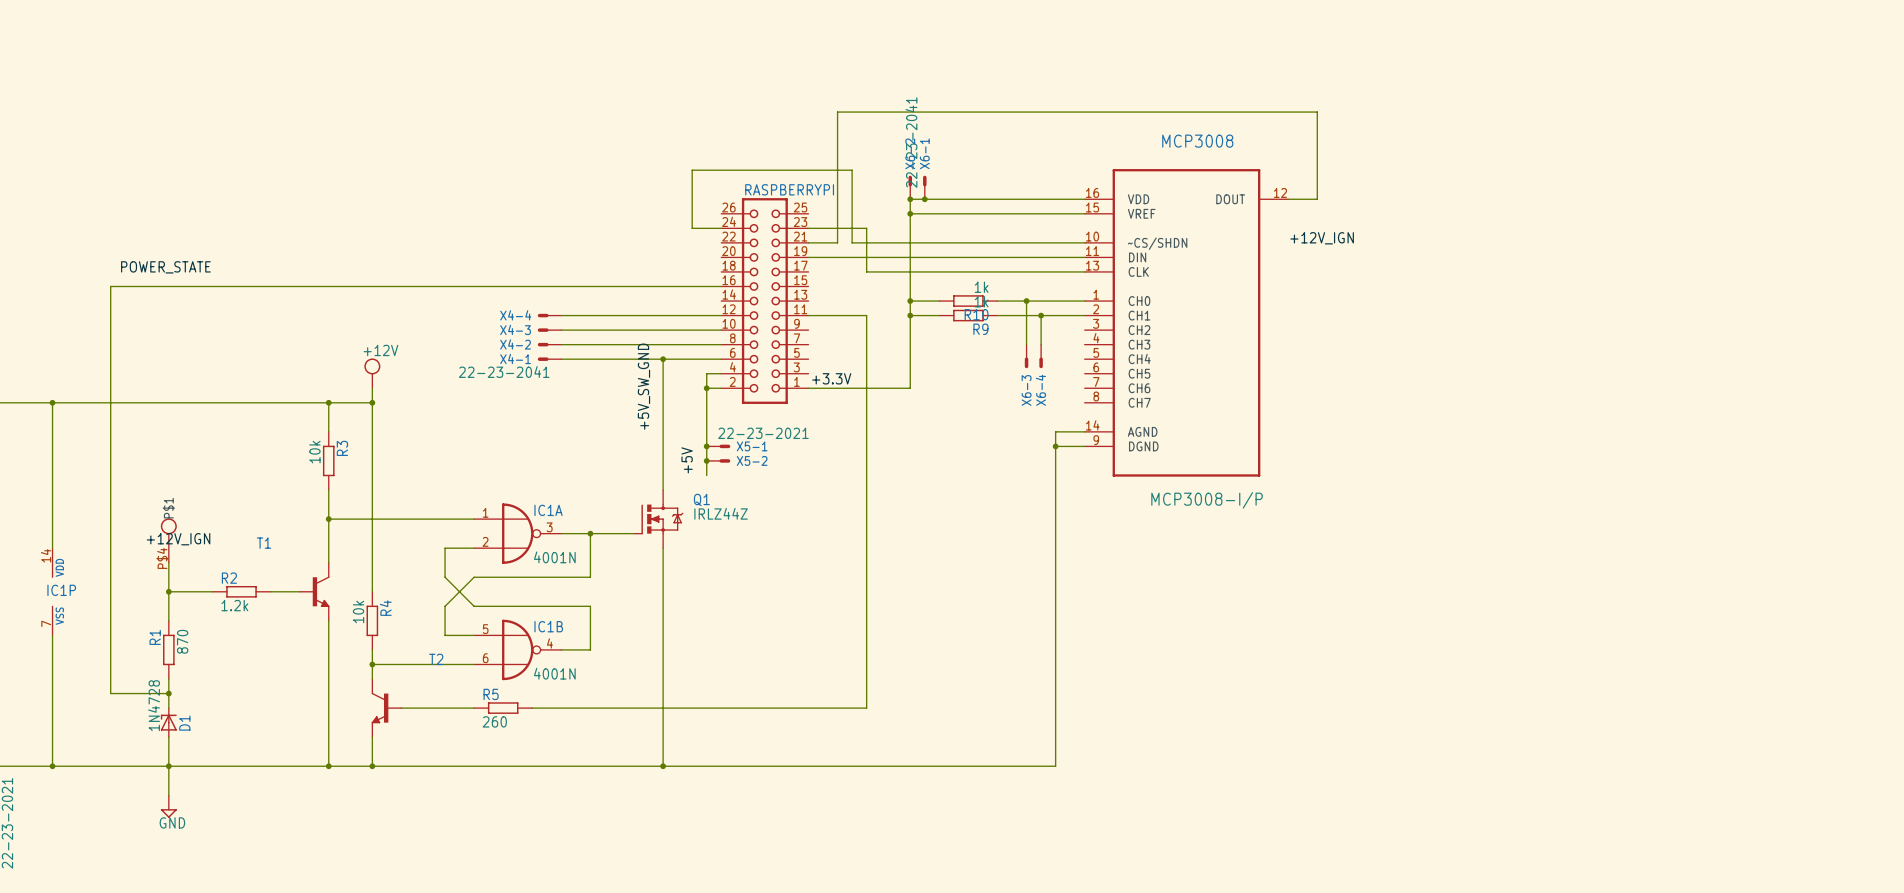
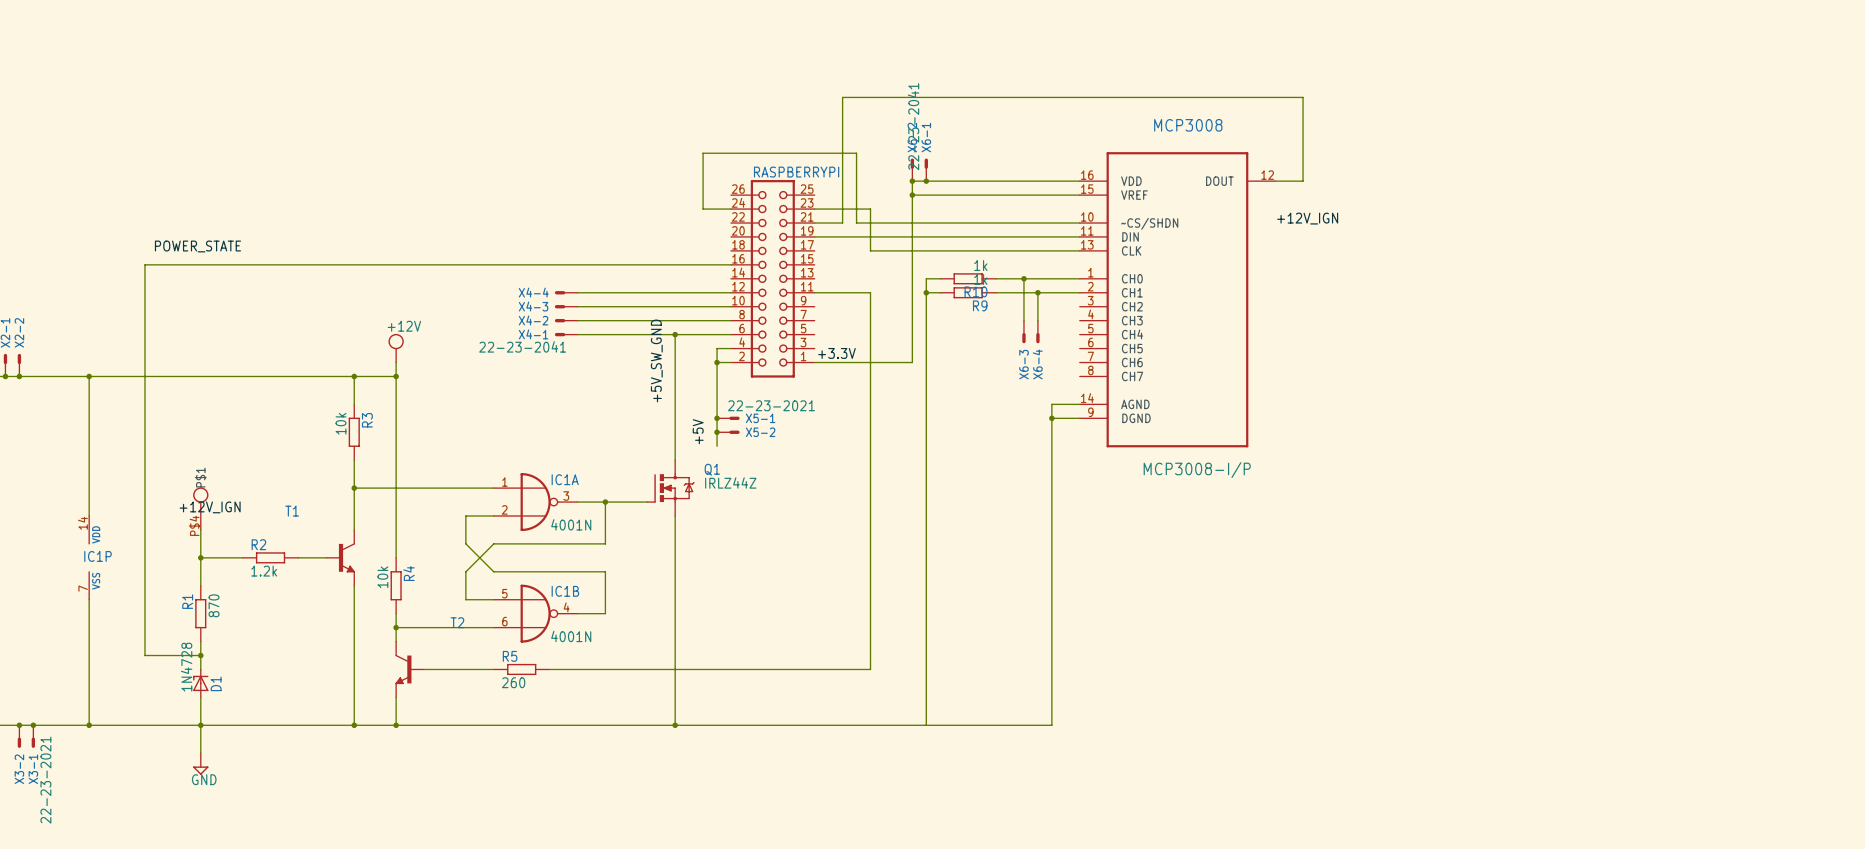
wire: (910, 301) (924, 301) -> (926, 725) (926, 278)
junction: (910, 301) -> none
wire: (910, 315) (924, 315) -> none
junction: (910, 315) -> none
junction: none -> (926, 292)

